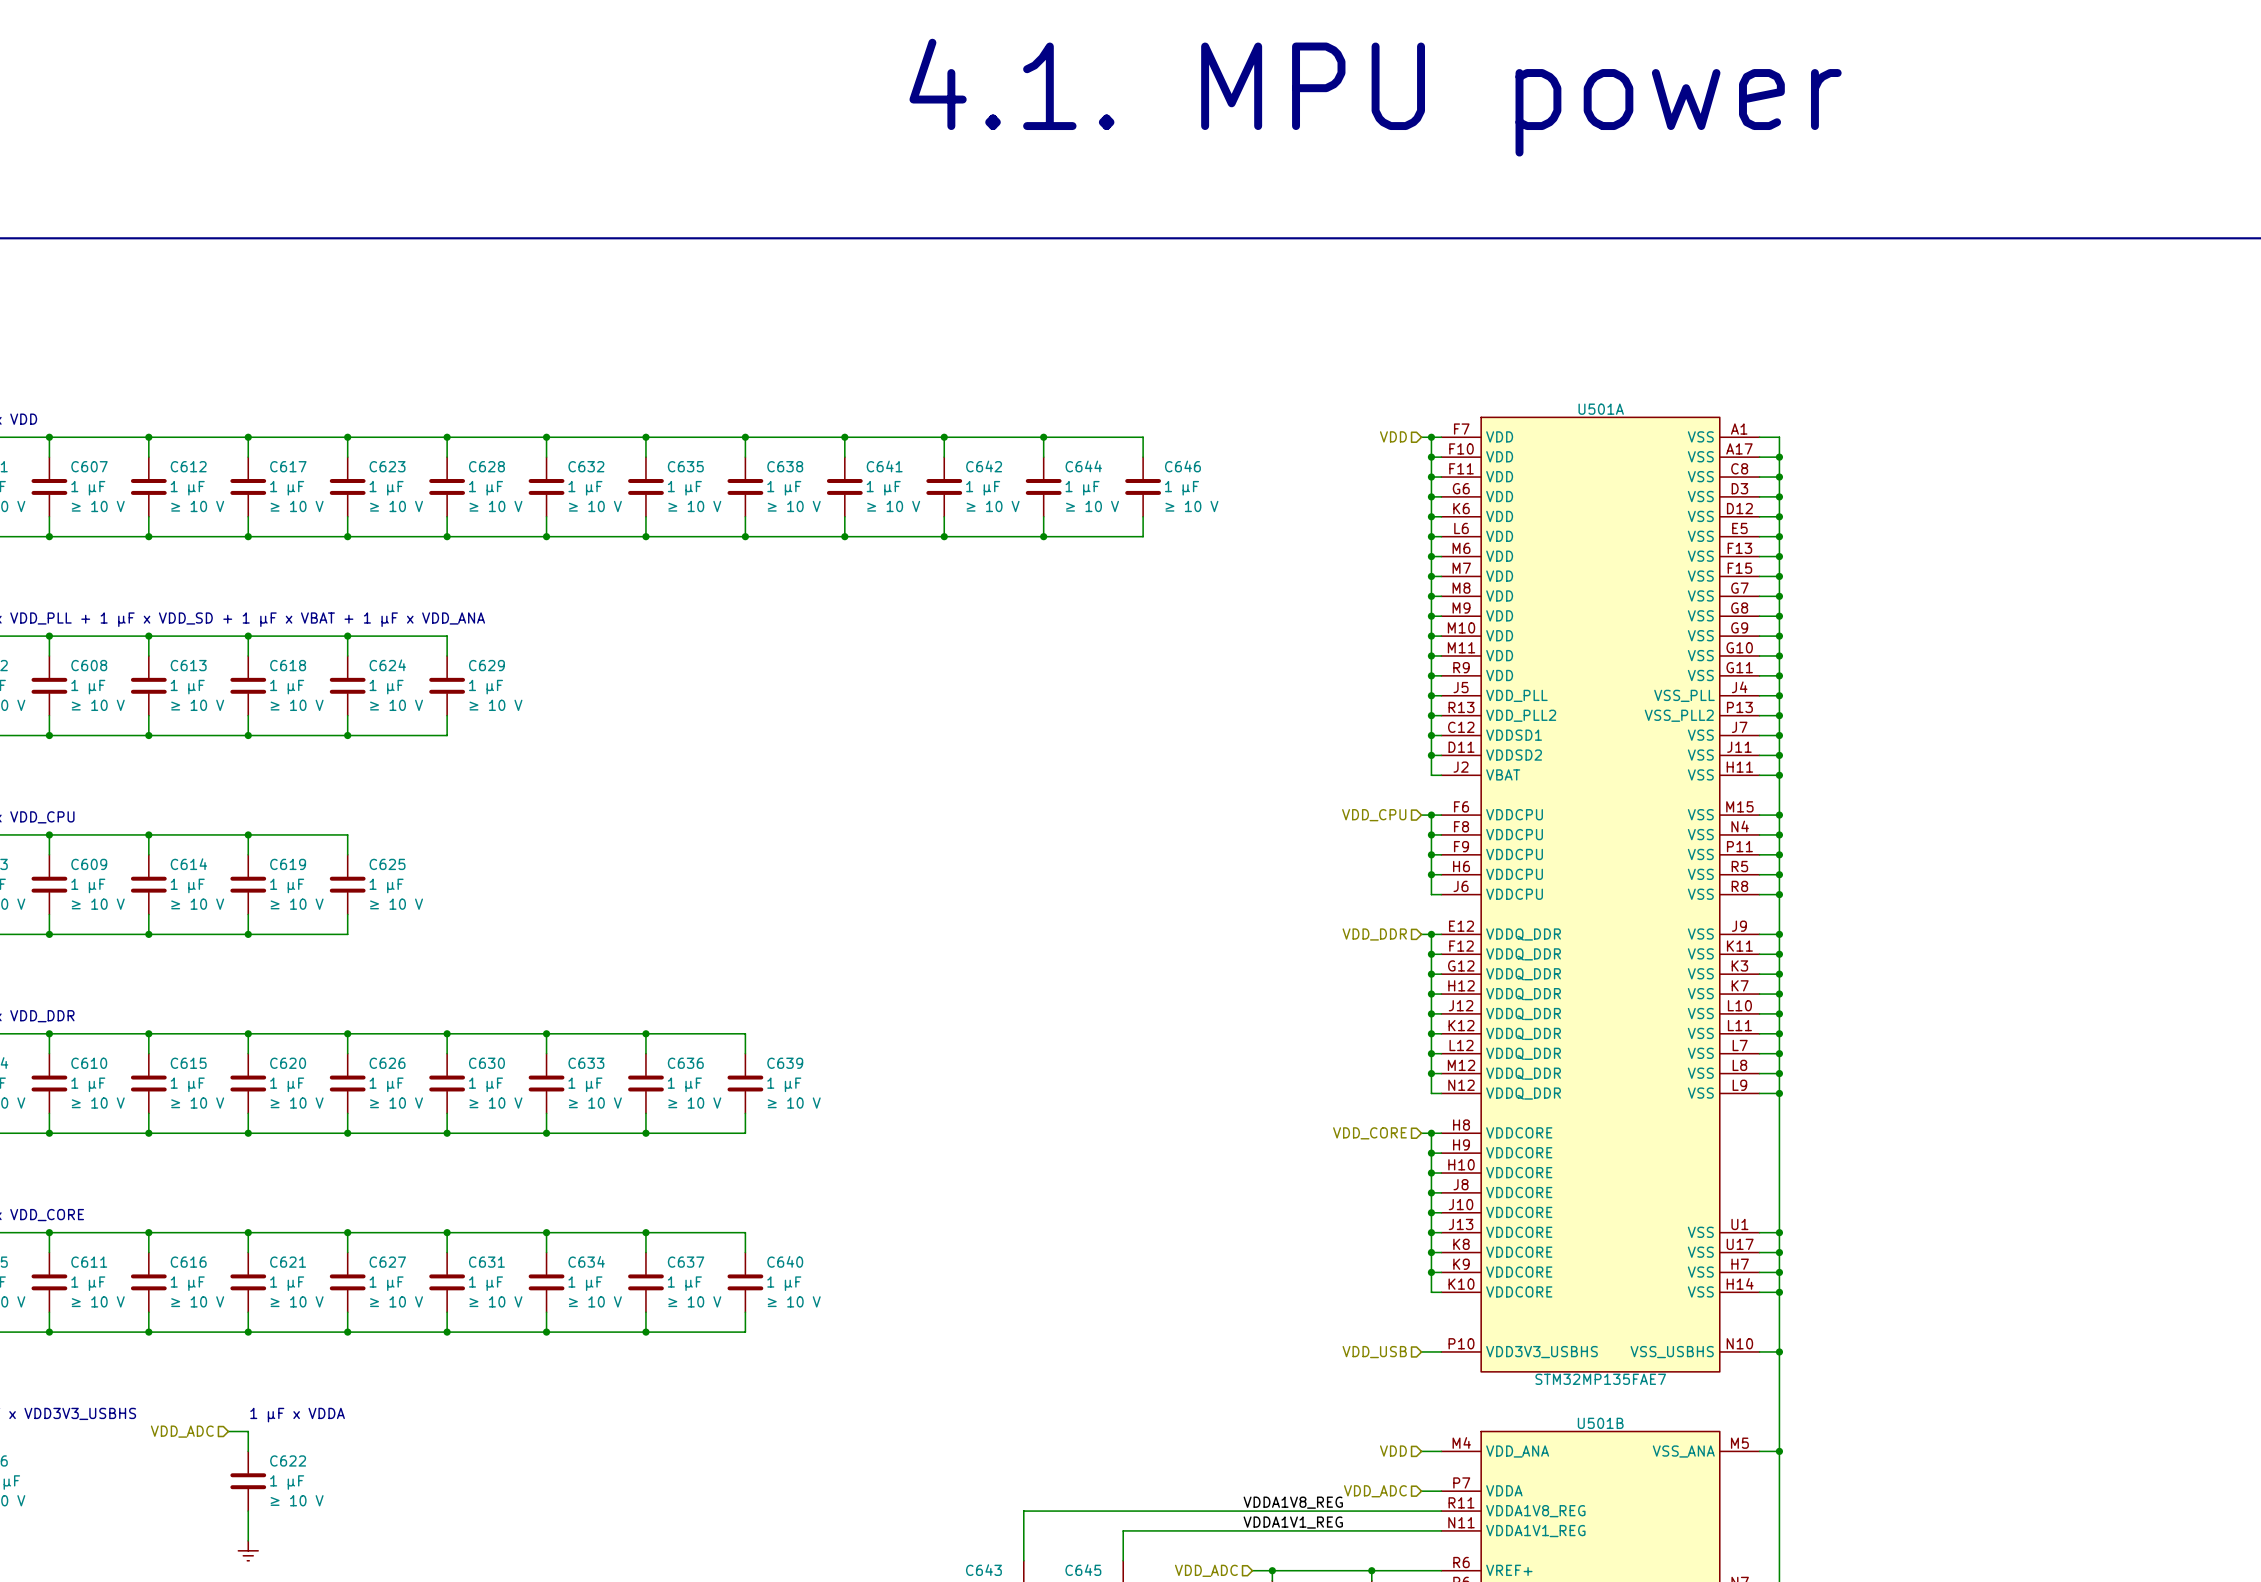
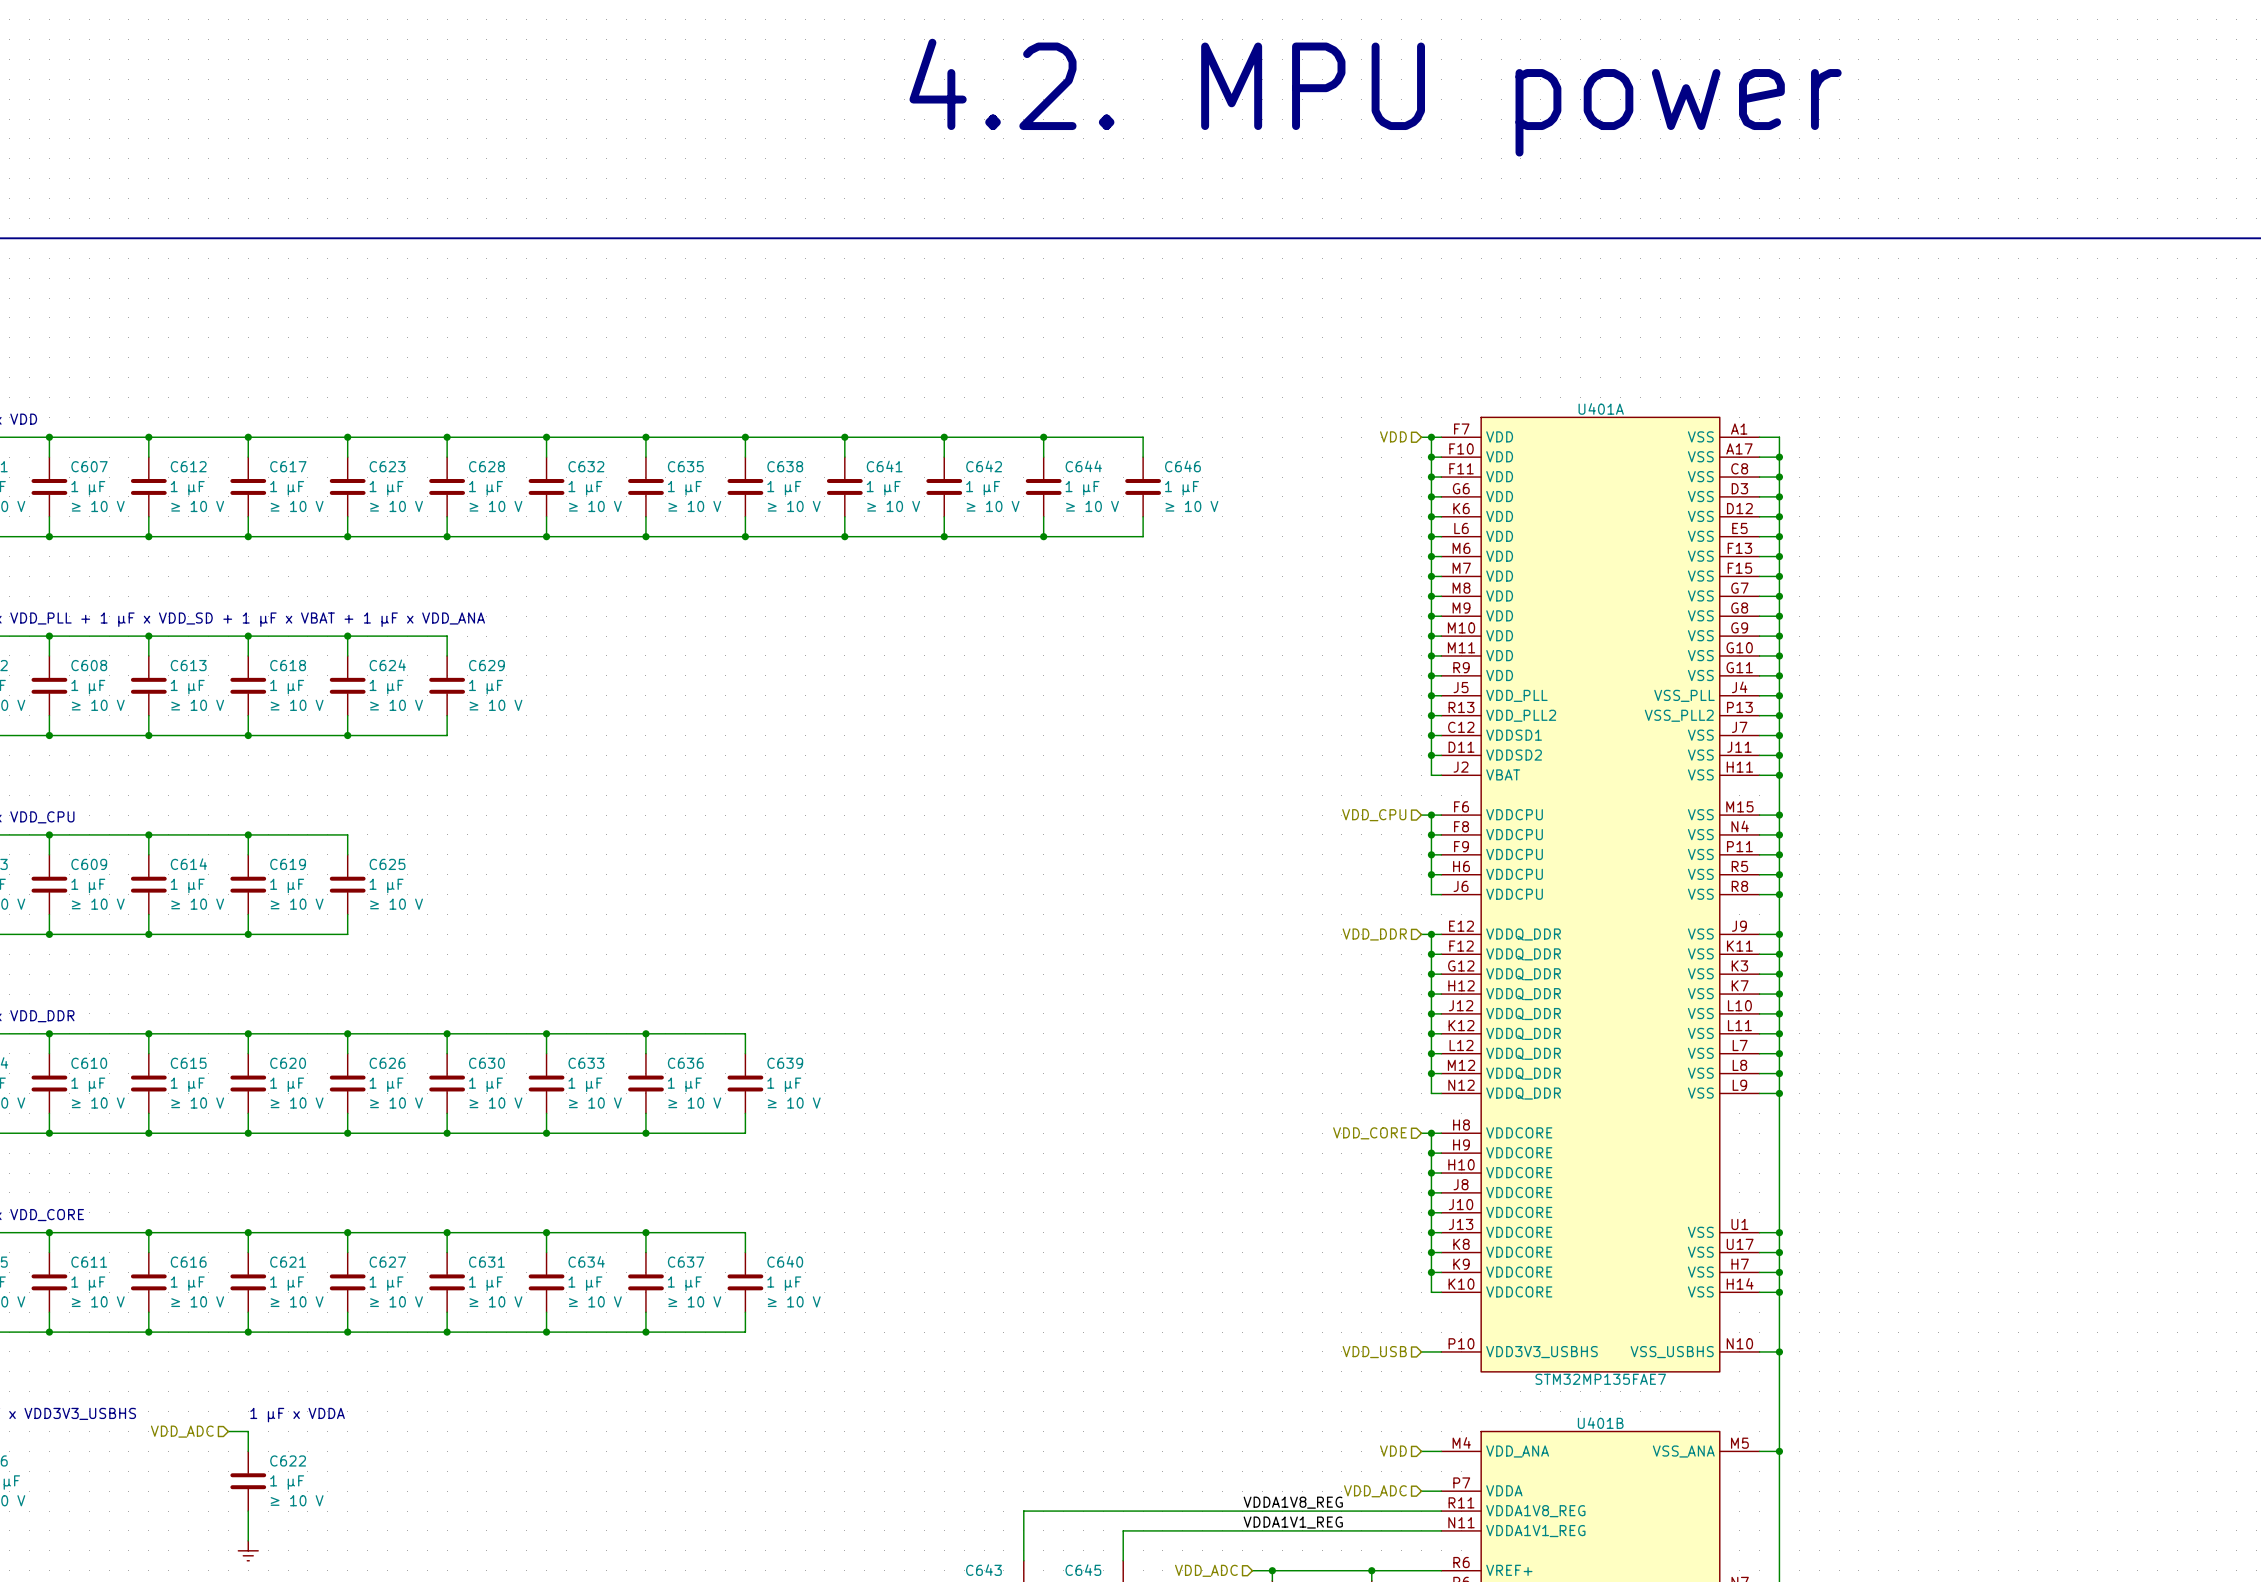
text: 4.1. MPU power (1375, 97) -> 4.2. MPU power (1375, 97)
U501A name: U501A (1601, 409) -> U401A (1601, 408)
U501B name: U501B (1600, 1423) -> U401B (1600, 1423)

